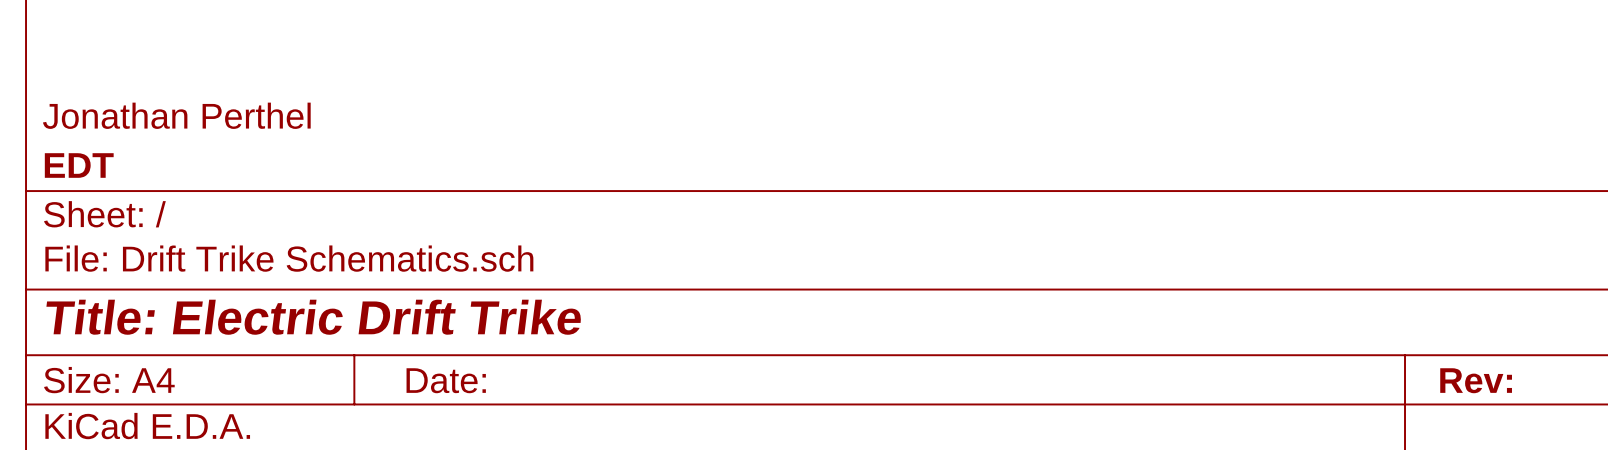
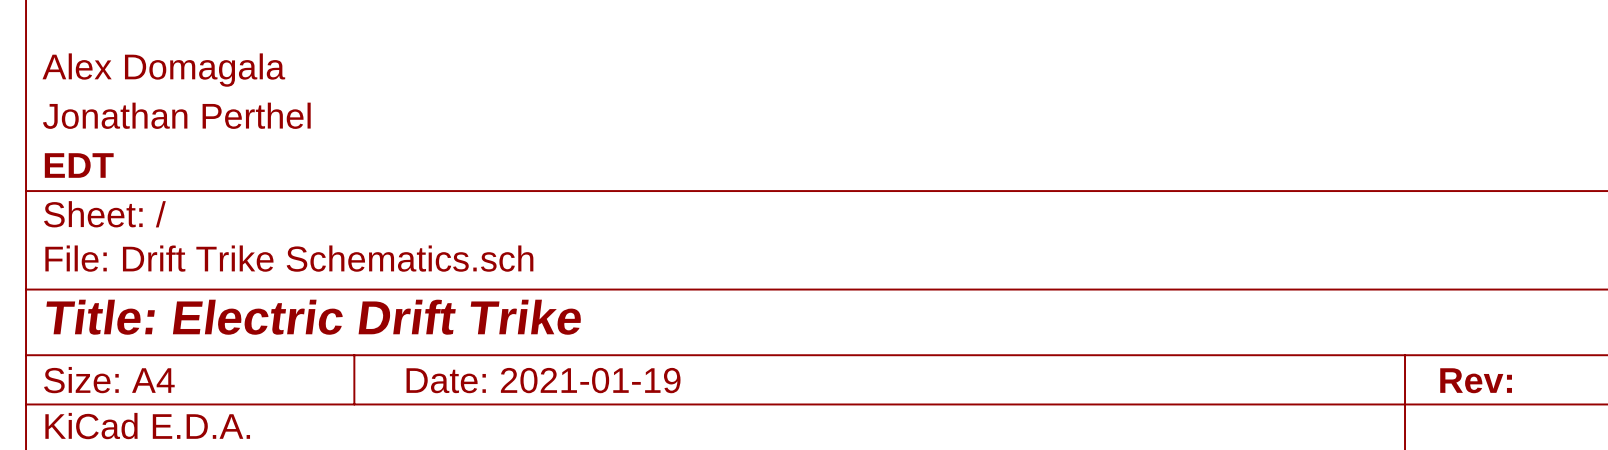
title block: none -> Alex Domagala (163, 70)
title block: Date: (446, 380) -> Date: 2021-01-19 (543, 380)

